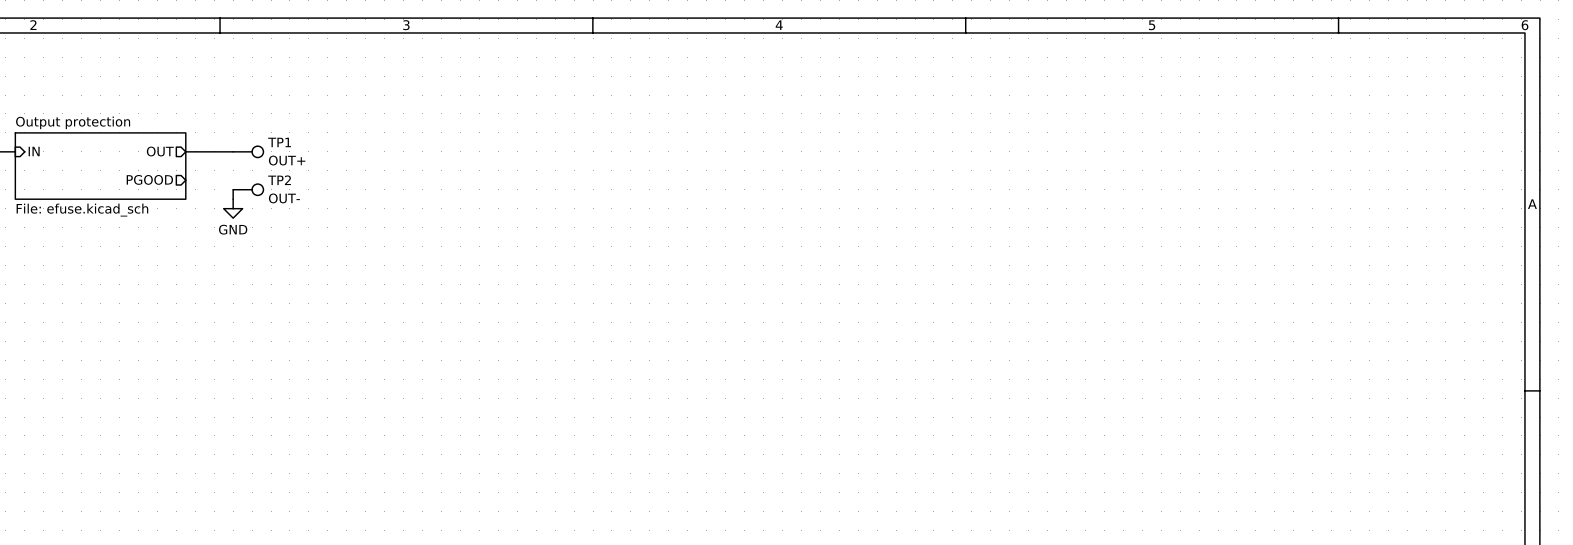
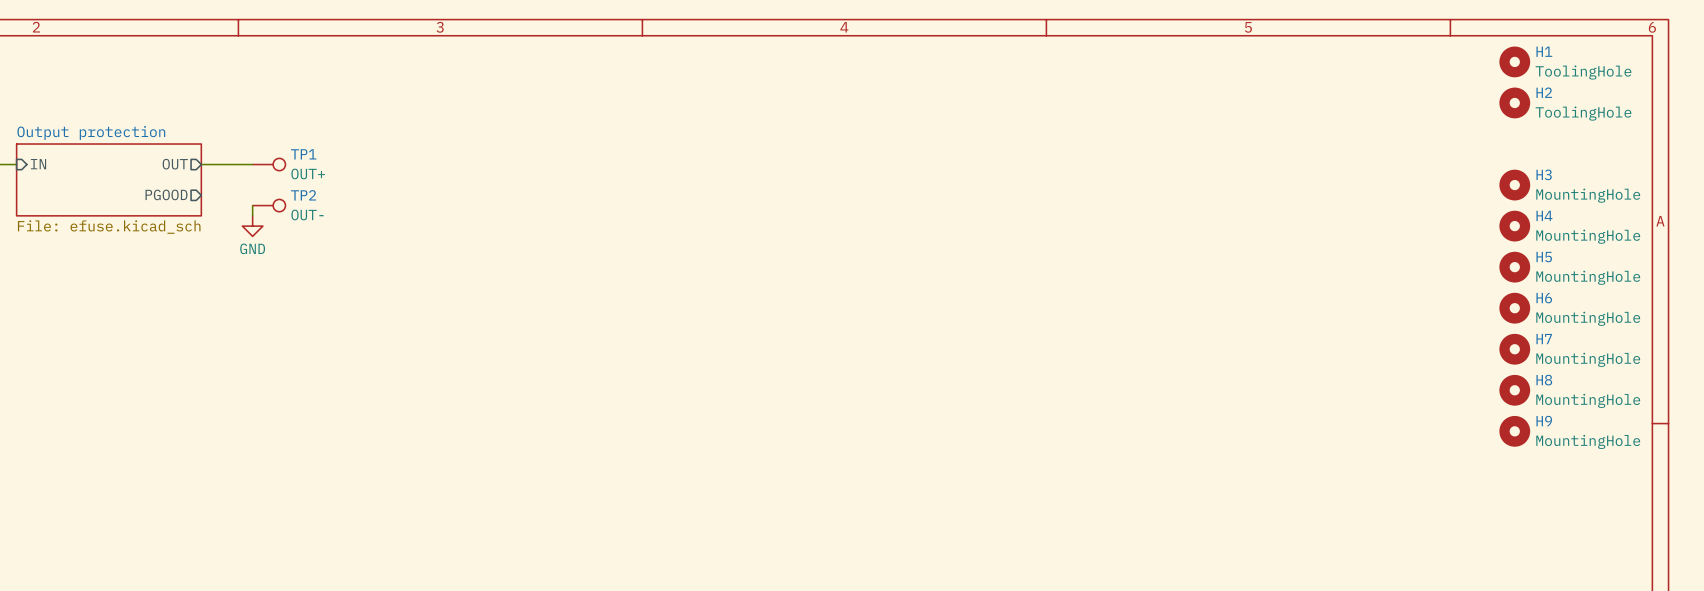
H1: none -> ToolingHole (1514, 61)
H2: none -> ToolingHole (1514, 102)
H3: none -> MountingHole (1514, 185)
H4: none -> MountingHole (1514, 226)
H5: none -> MountingHole (1514, 267)
H6: none -> MountingHole (1514, 308)
H7: none -> MountingHole (1514, 349)
H8: none -> MountingHole (1514, 390)
H9: none -> MountingHole (1514, 431)

